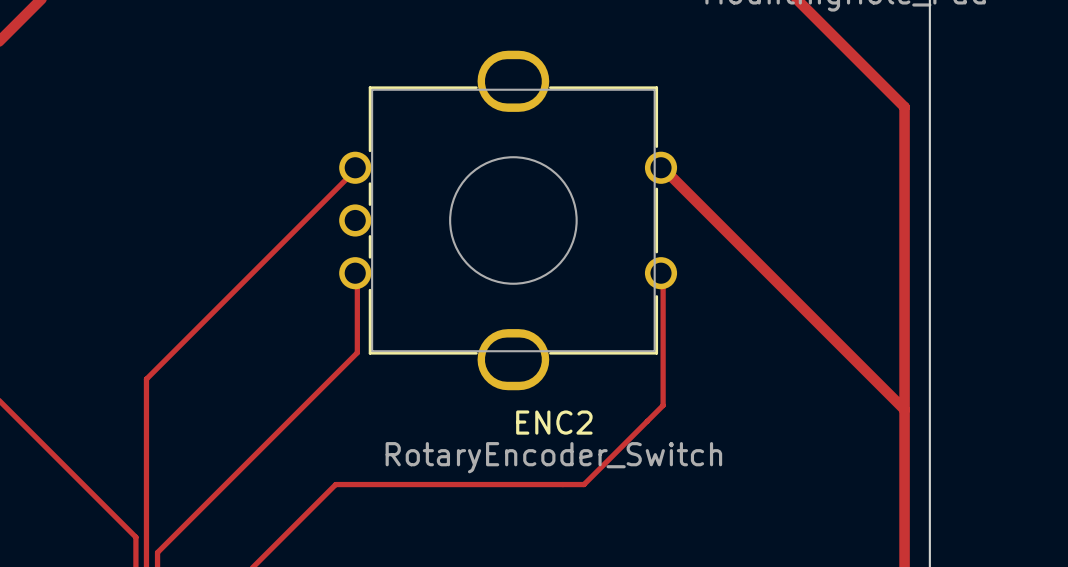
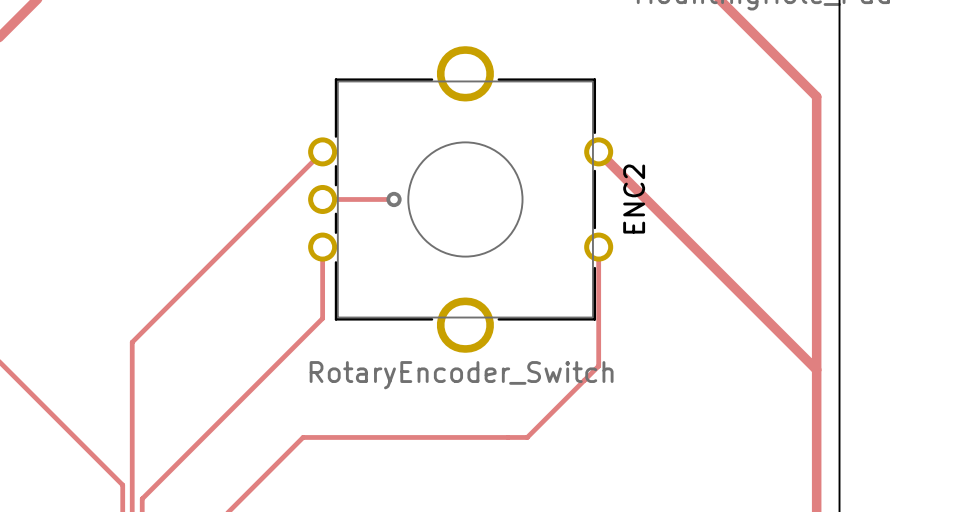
ENC2 footprint: [339, 50, 678, 391] -> [308, 46, 614, 353]
track: none -> (322, 199) (394, 199)
via: none -> (394, 199)
ENC2 name rotation: 0° (554, 422) -> 90° counterclockwise (634, 199)
ENC2 name position: ENC2 (554, 422) -> ENC2 (634, 199)
ENC2 value position: RotaryEncoder_Switch (553, 457) -> RotaryEncoder_Switch (461, 375)

